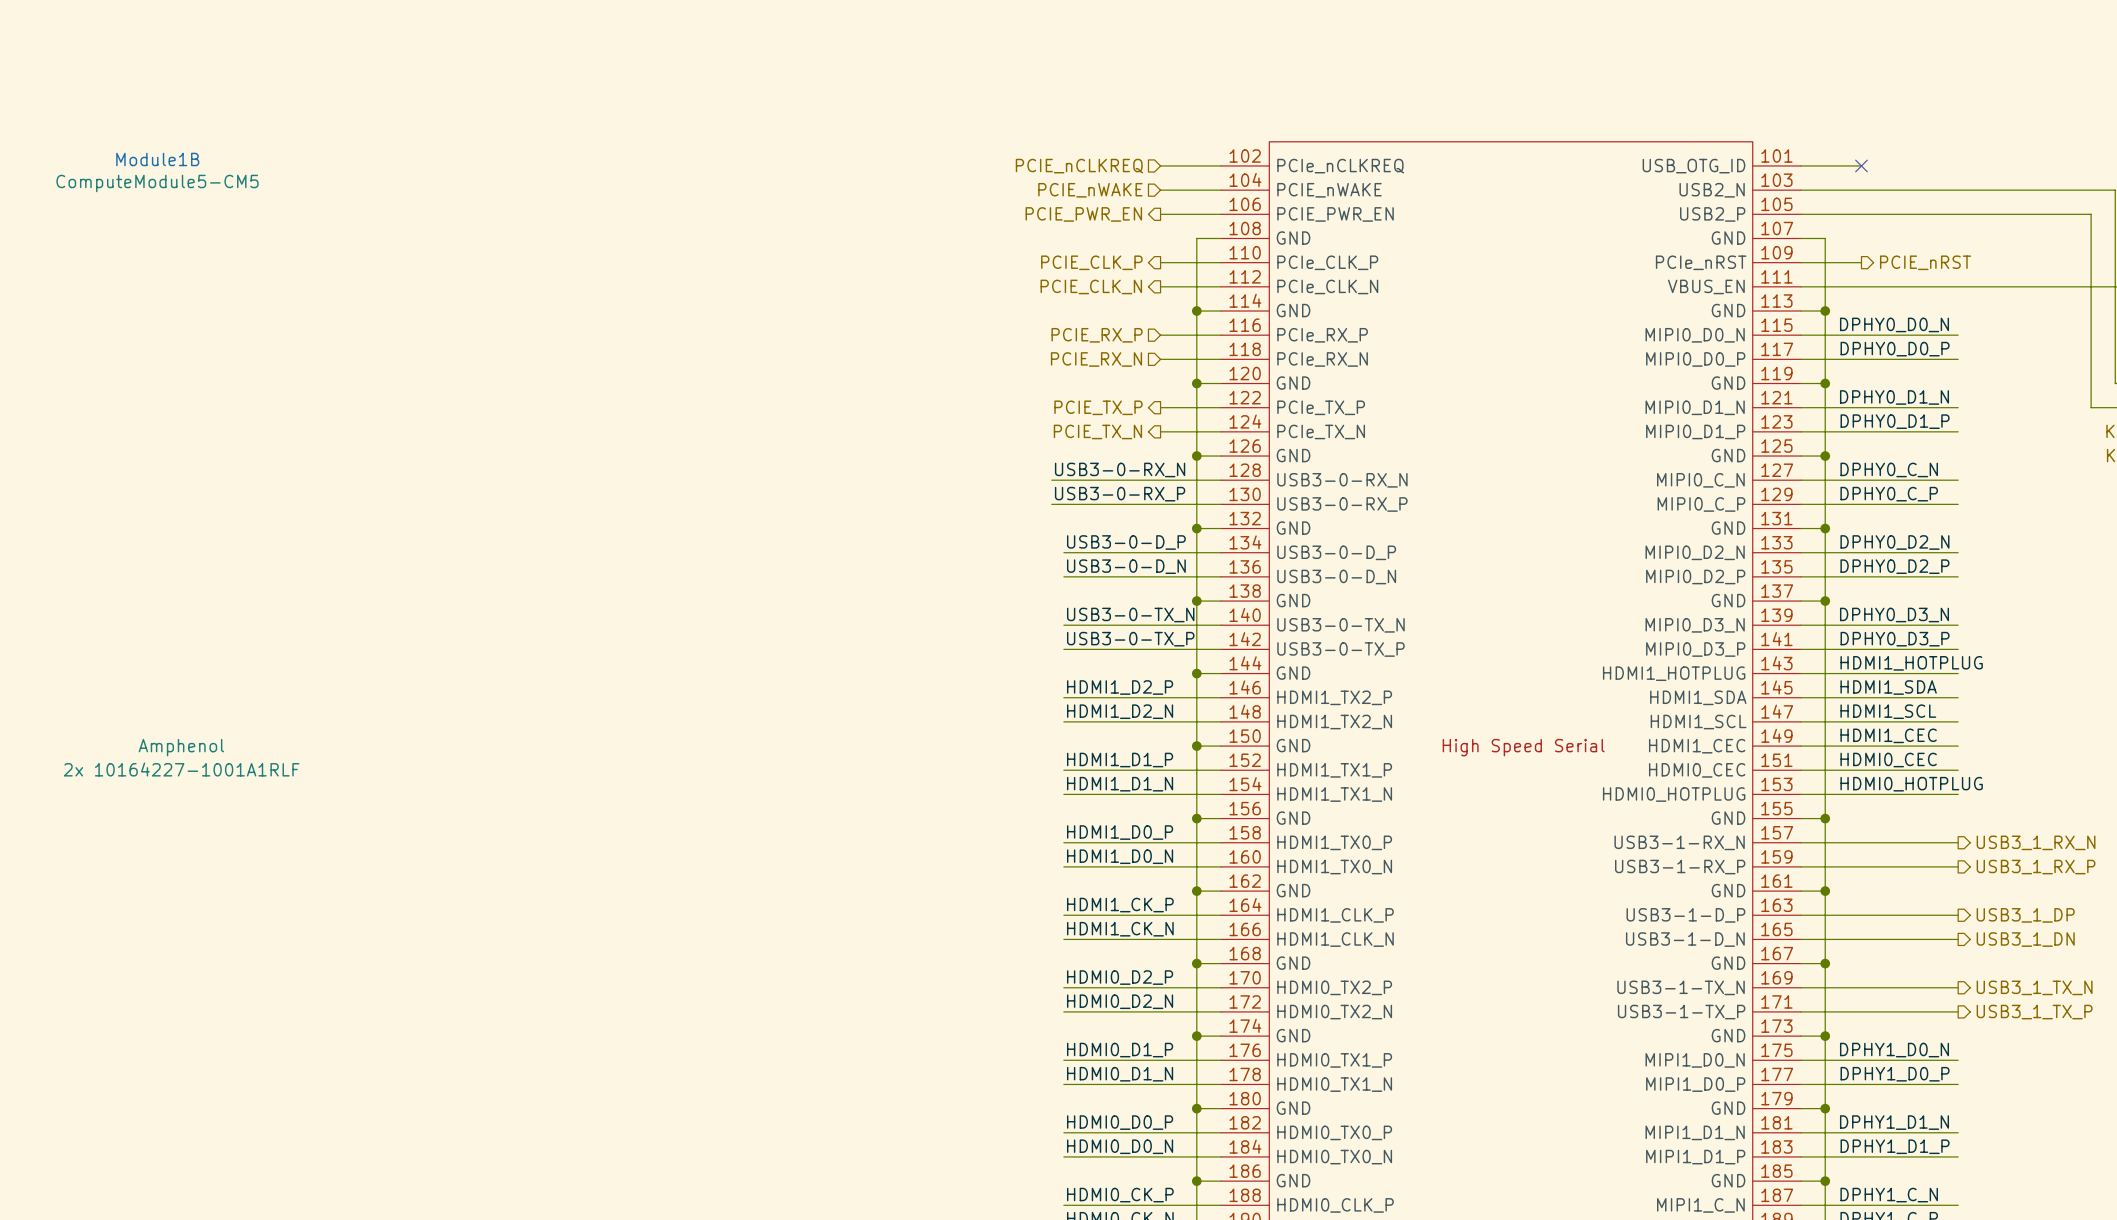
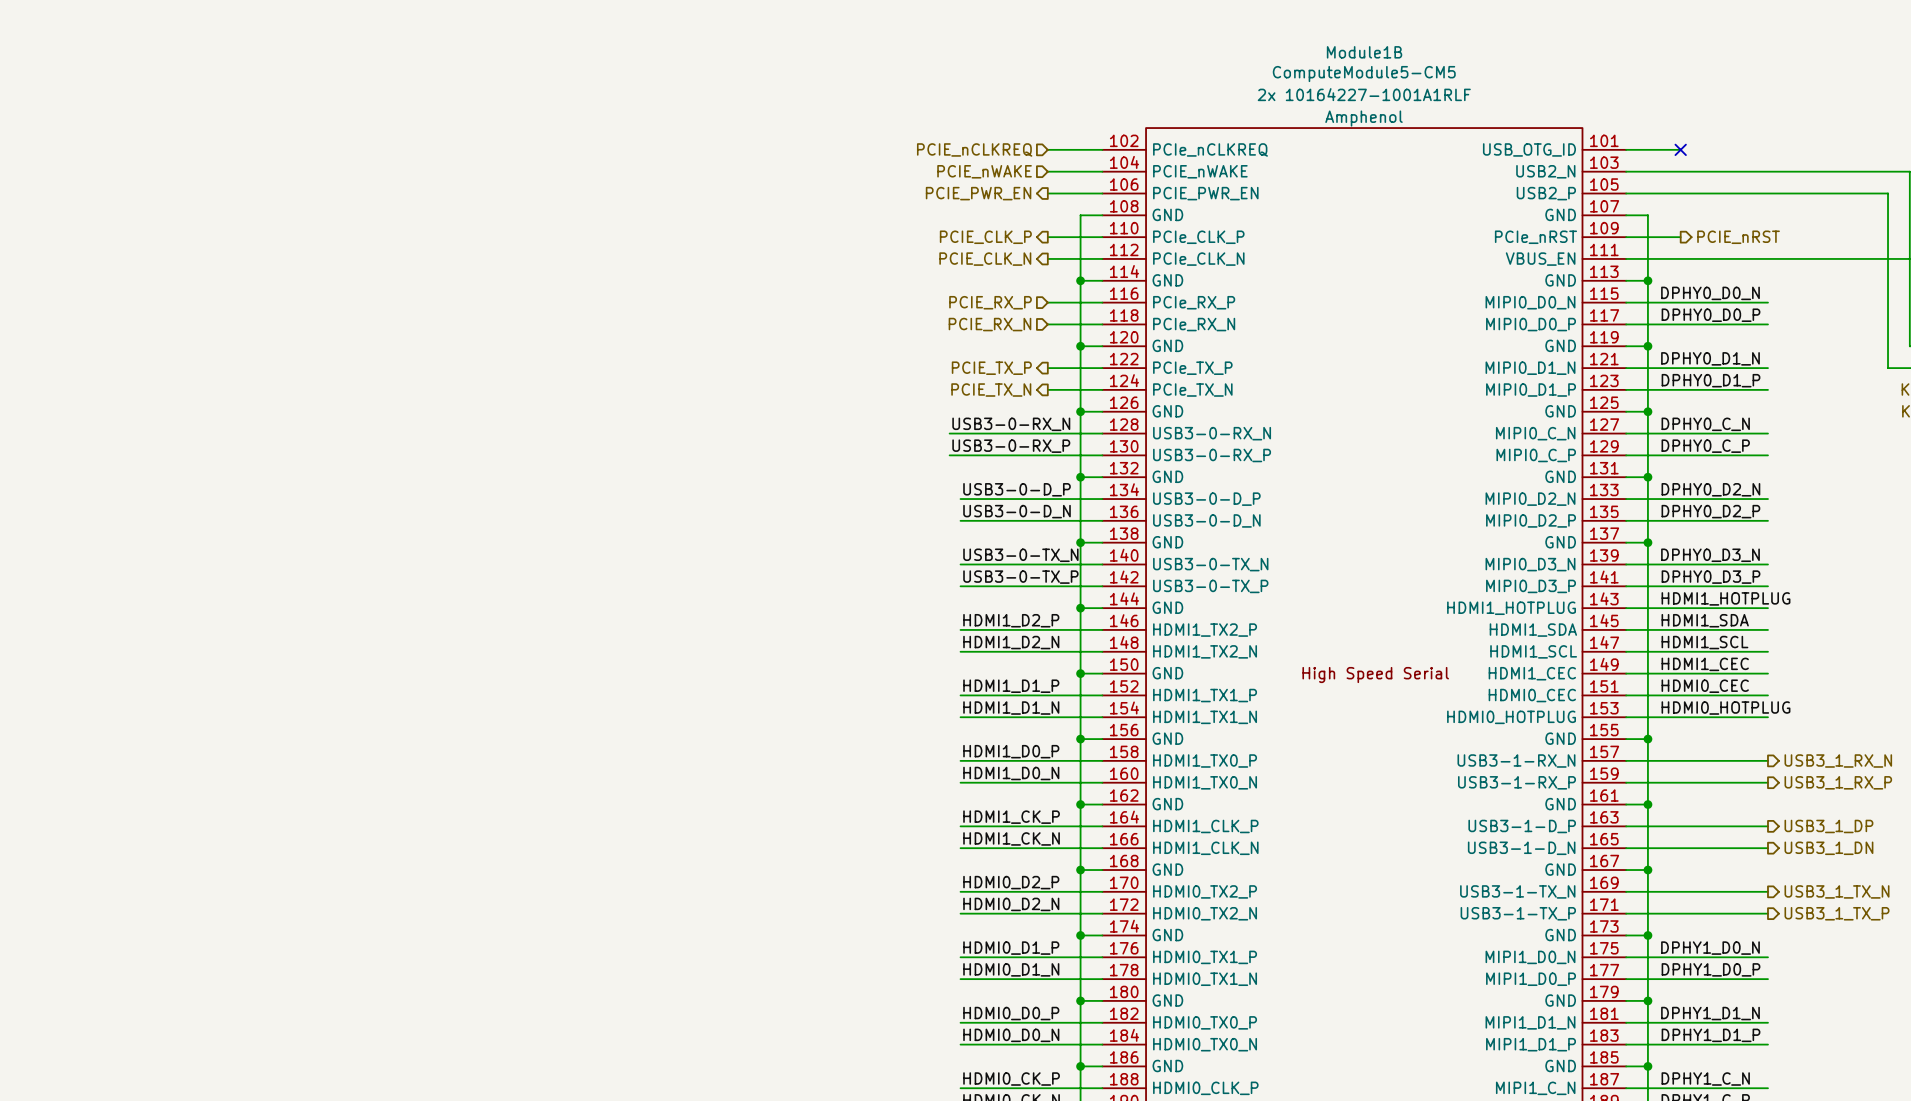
Module1B name position: Module1B (157, 159) -> Module1B (1364, 52)
Module1B value position: ComputeModule5-CM5 (157, 183) -> ComputeModule5-CM5 (1364, 74)
Module1B text position: Amphenol (181, 747) -> Amphenol (1364, 118)
Module1B text position: 2x 10164227-1001A1RLF (181, 769) -> 2x 10164227-1001A1RLF (1364, 94)

